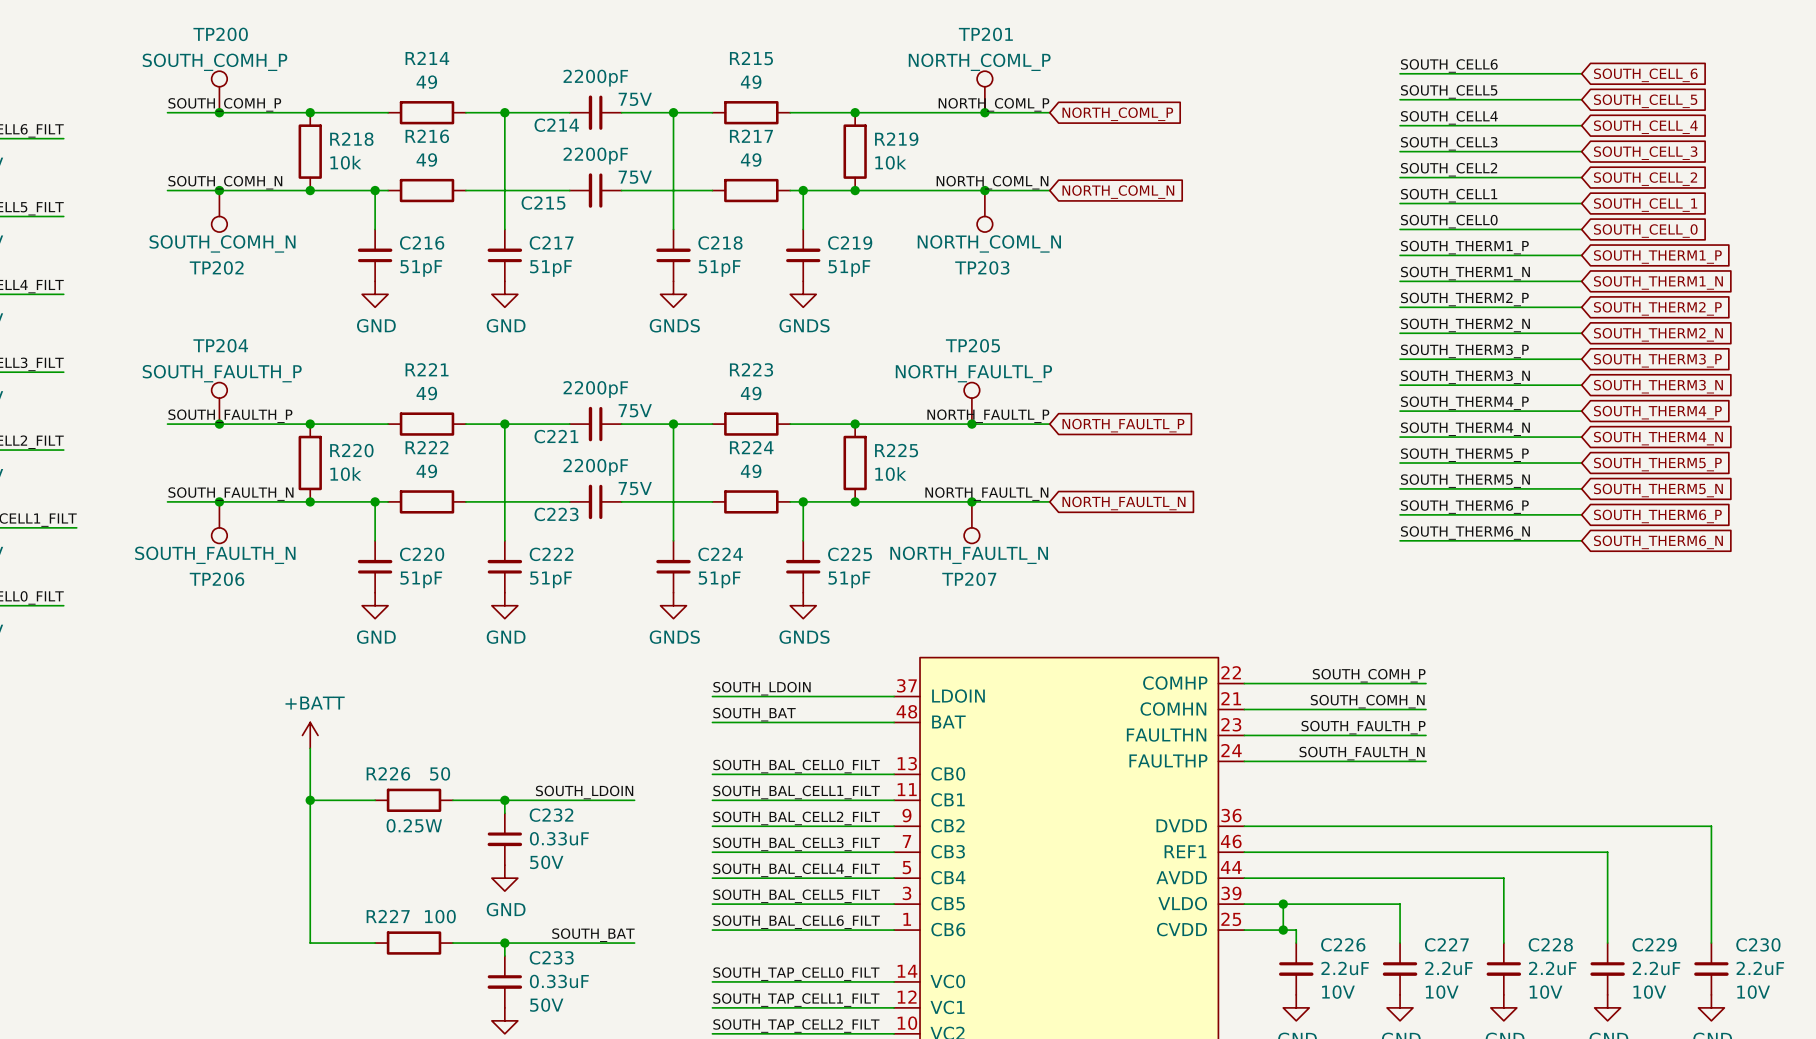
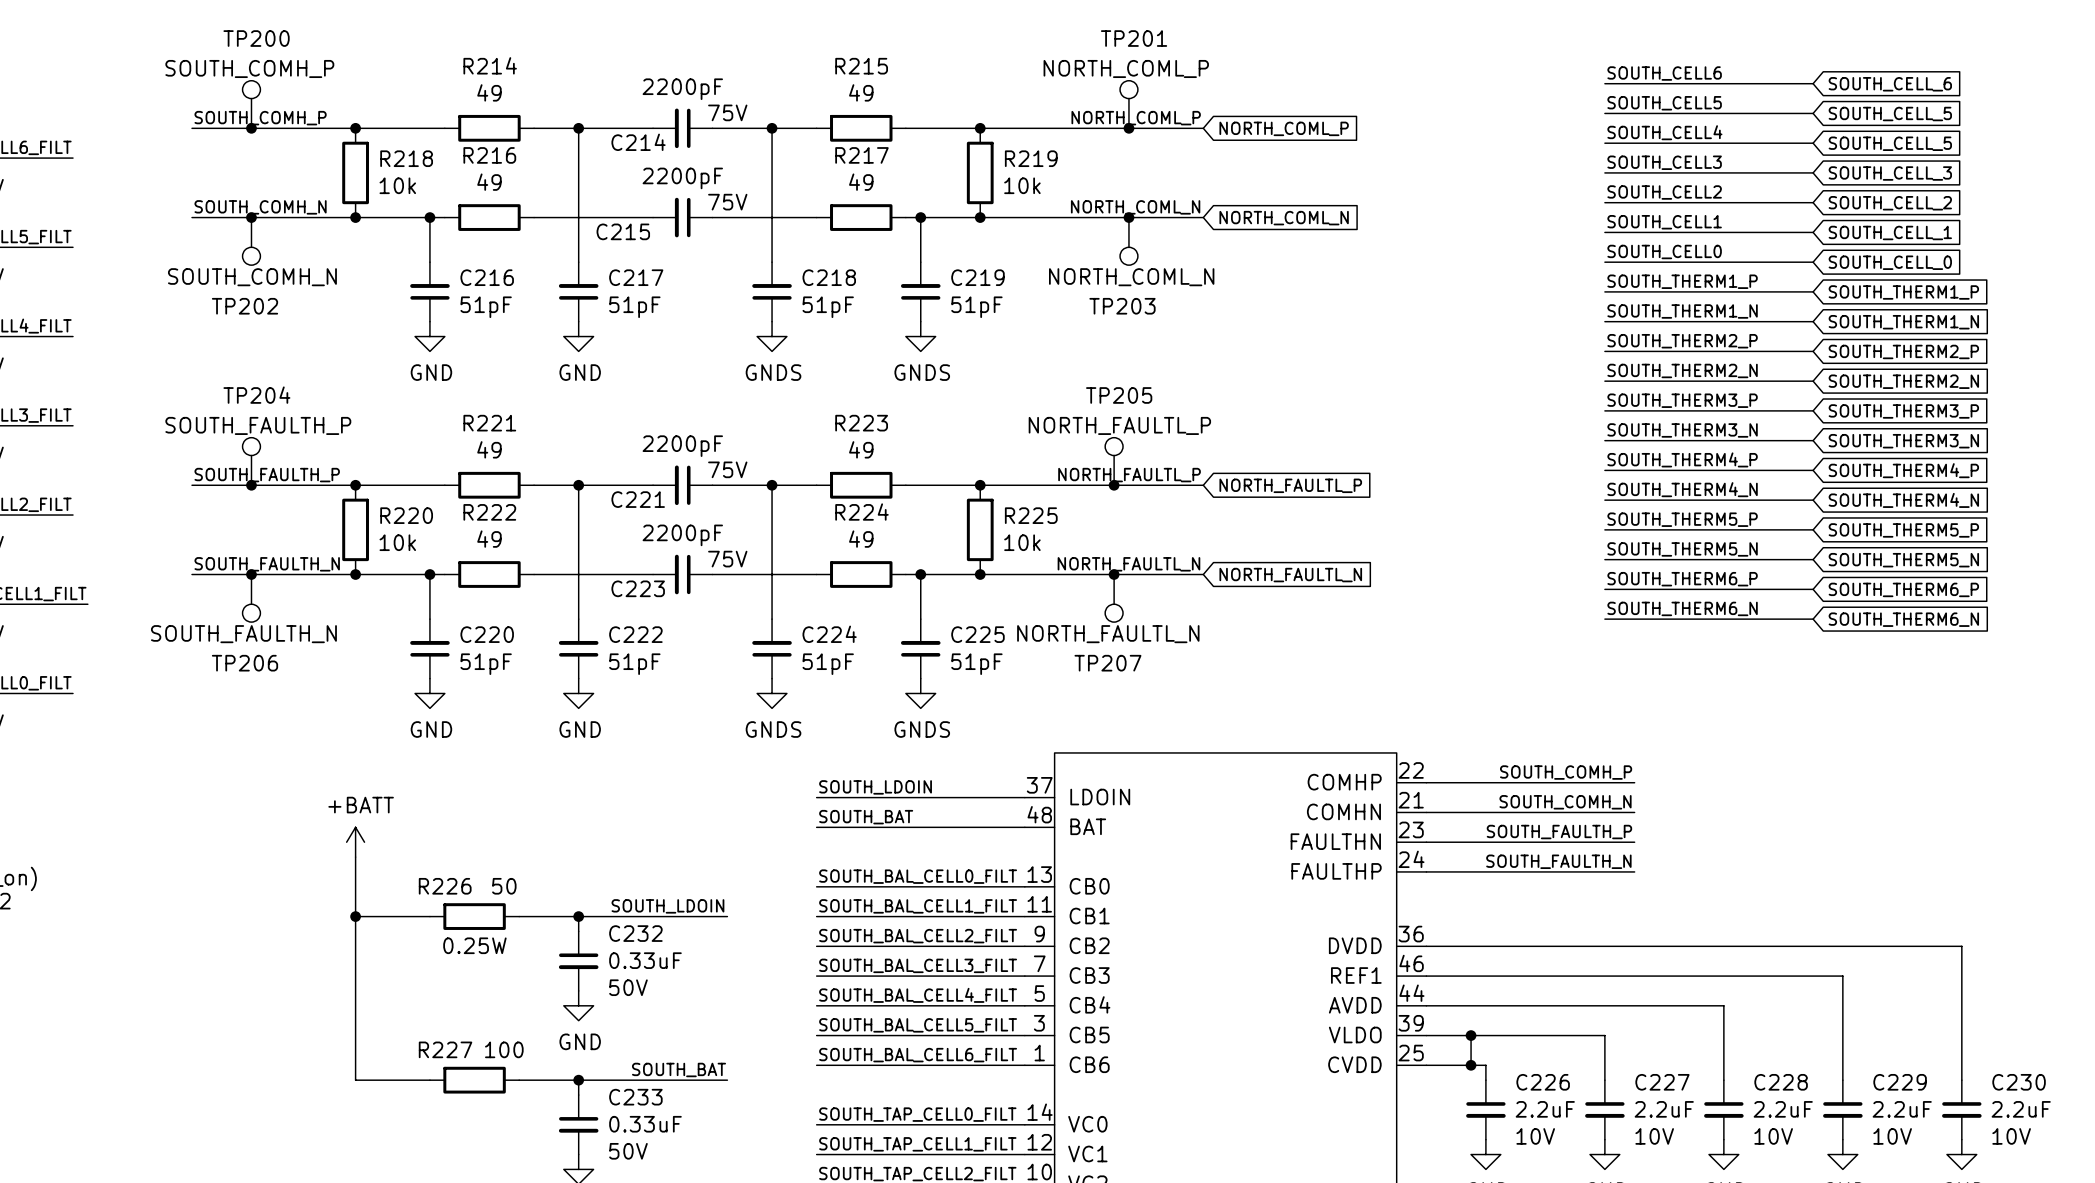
global label: SOUTH_CELL_4 (1645, 127) -> SOUTH_CELL_5 (1890, 143)

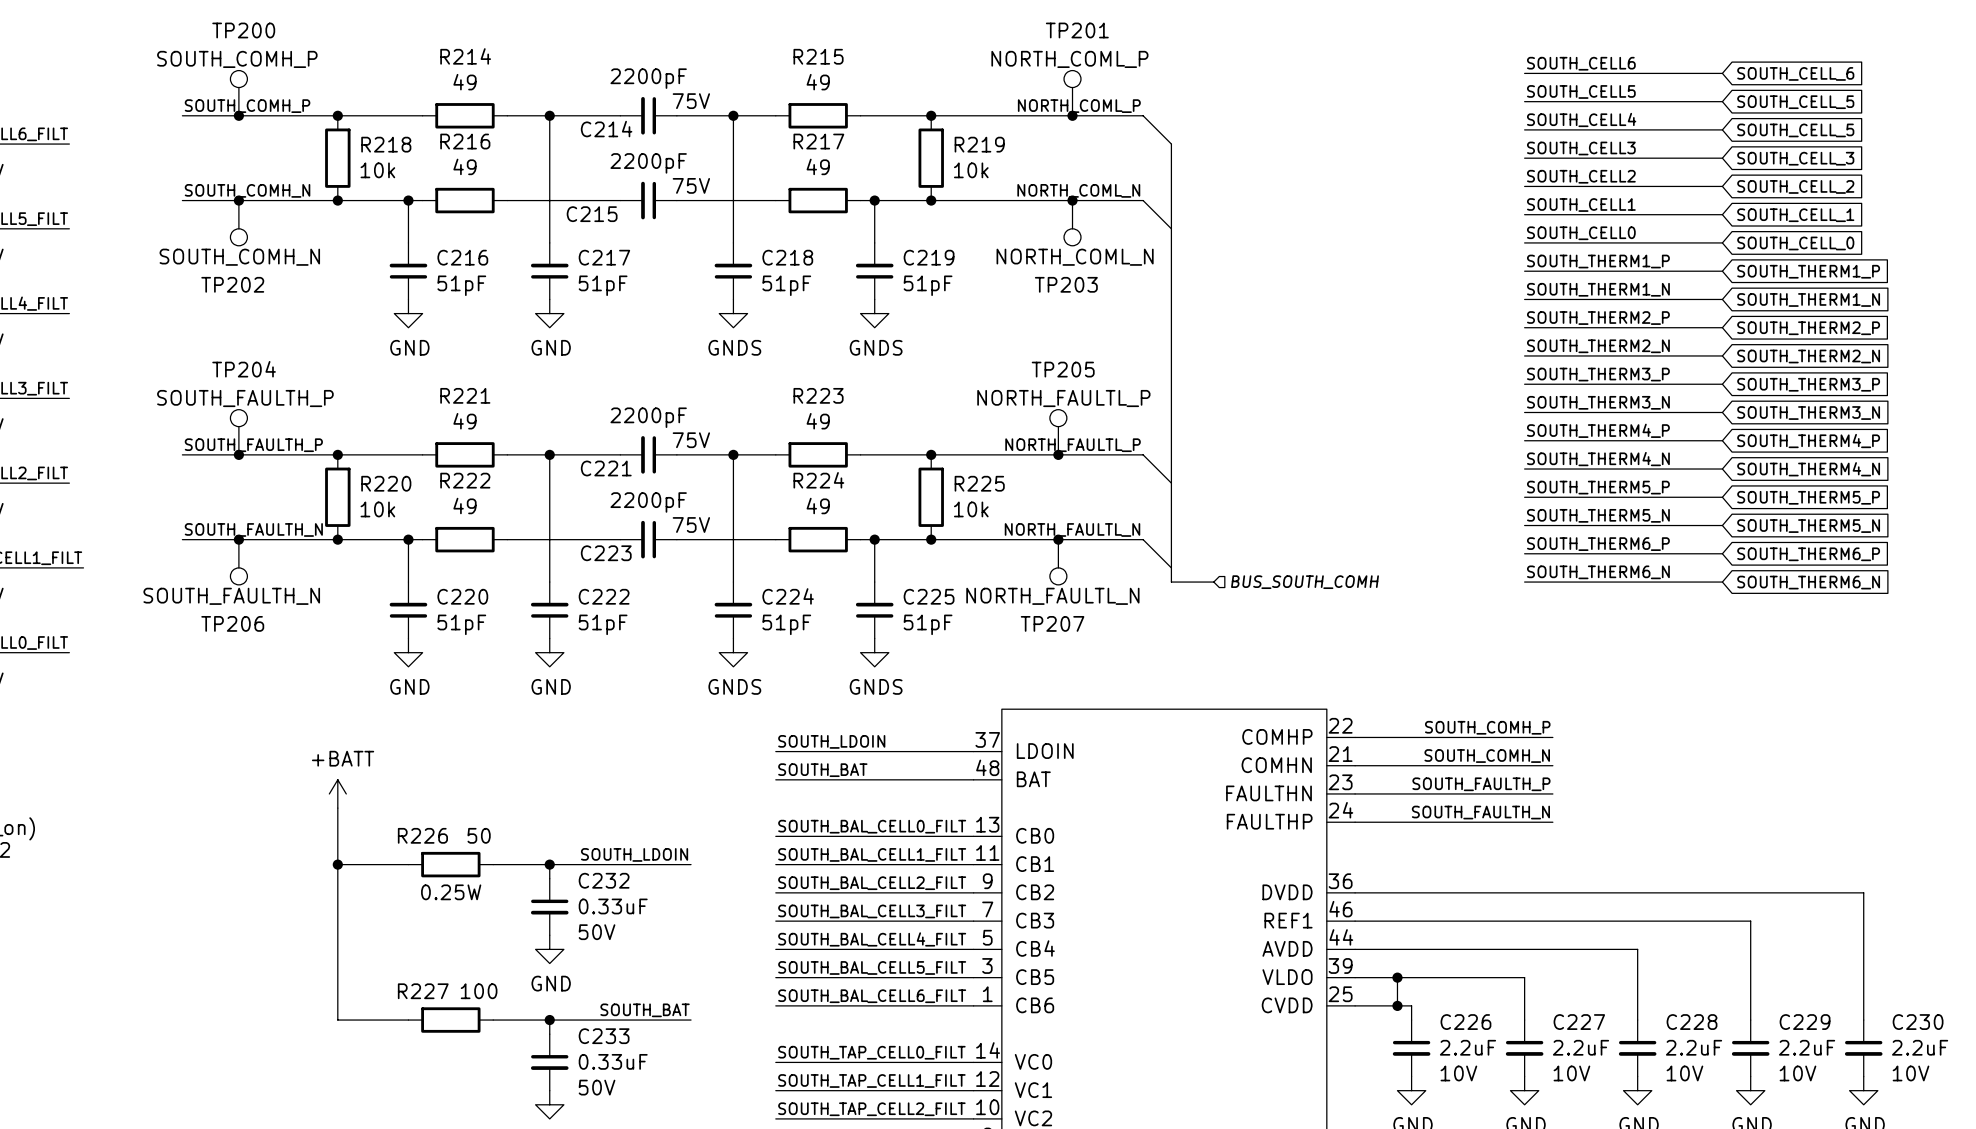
wire: none -> (1143, 115) (1171, 144)
global label: NORTH_COML_P (1284, 128) -> none
bus: none -> (1171, 144) (1171, 582) (1213, 582)
wire: none -> (1143, 200) (1171, 228)
global label: NORTH_COML_N (1284, 218) -> none
wire: none -> (1143, 454) (1171, 483)
global label: NORTH_FAULTL_P (1290, 485) -> none
wire: none -> (1143, 539) (1171, 567)
global label: NORTH_FAULTL_N (1290, 575) -> none
hierarchical label: none -> BUS_SOUTH_COMH (1305, 582)

